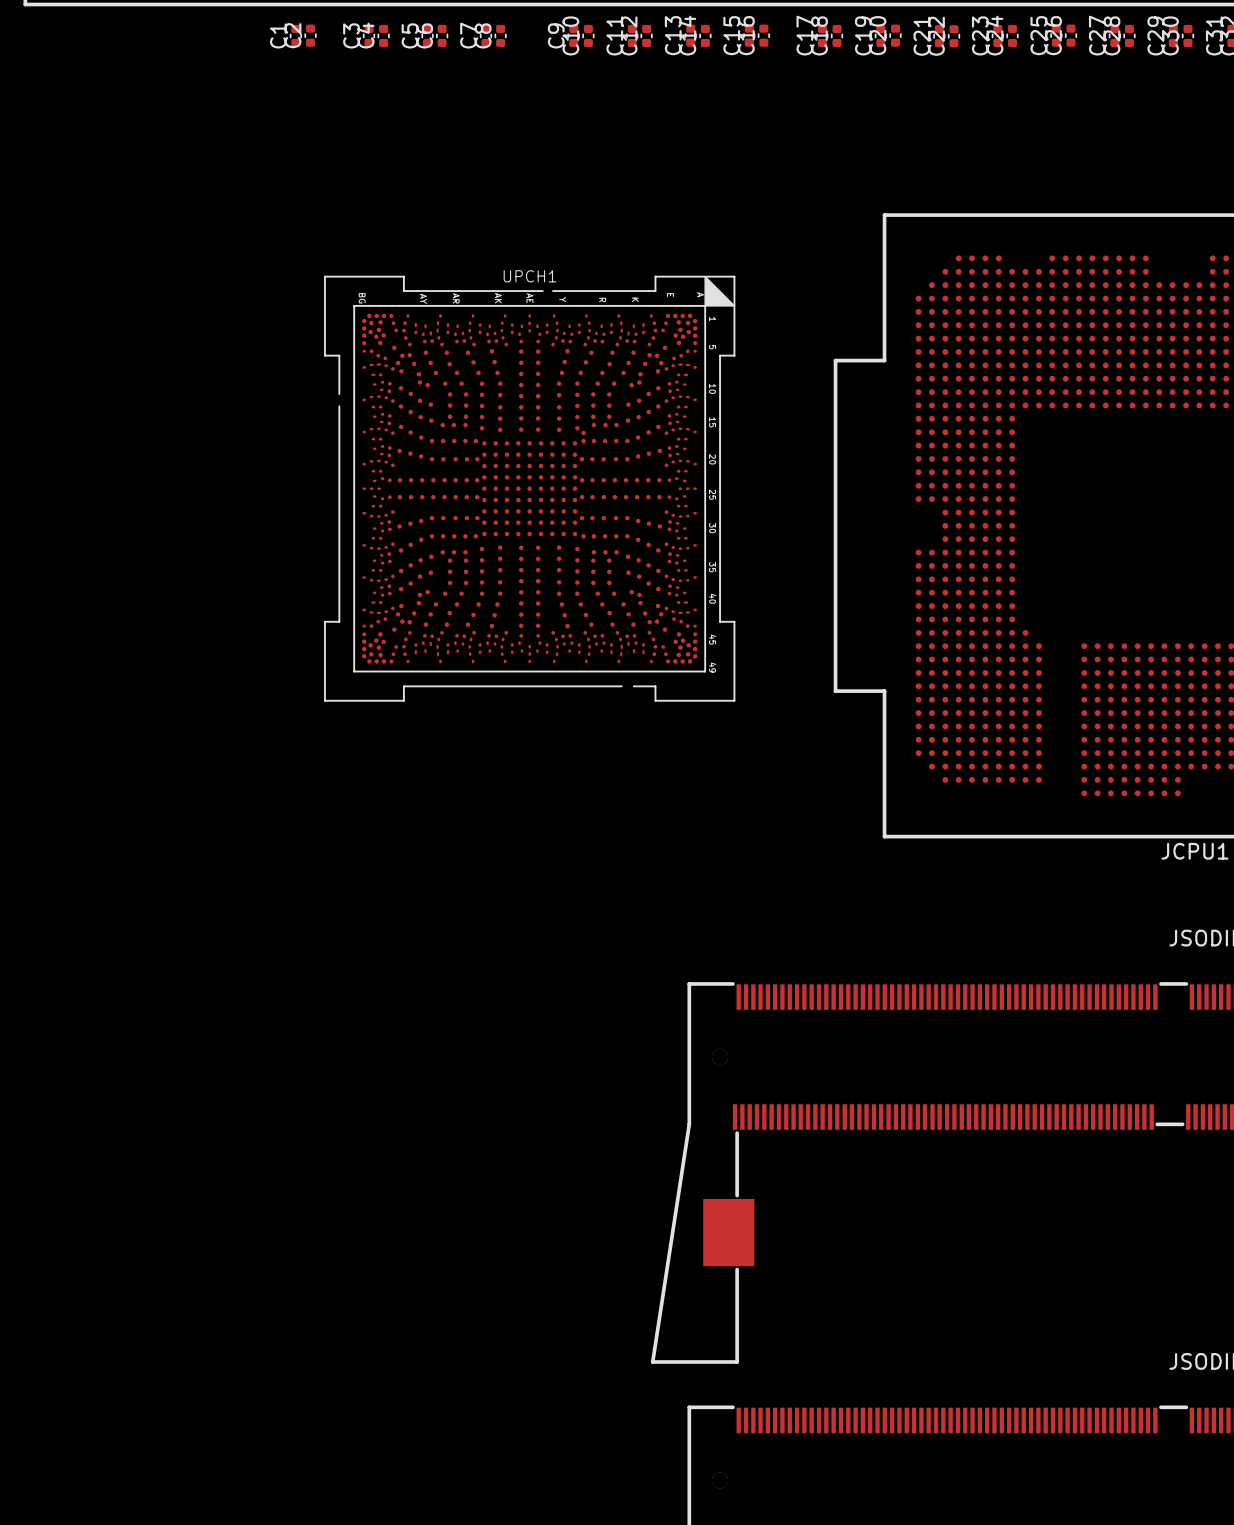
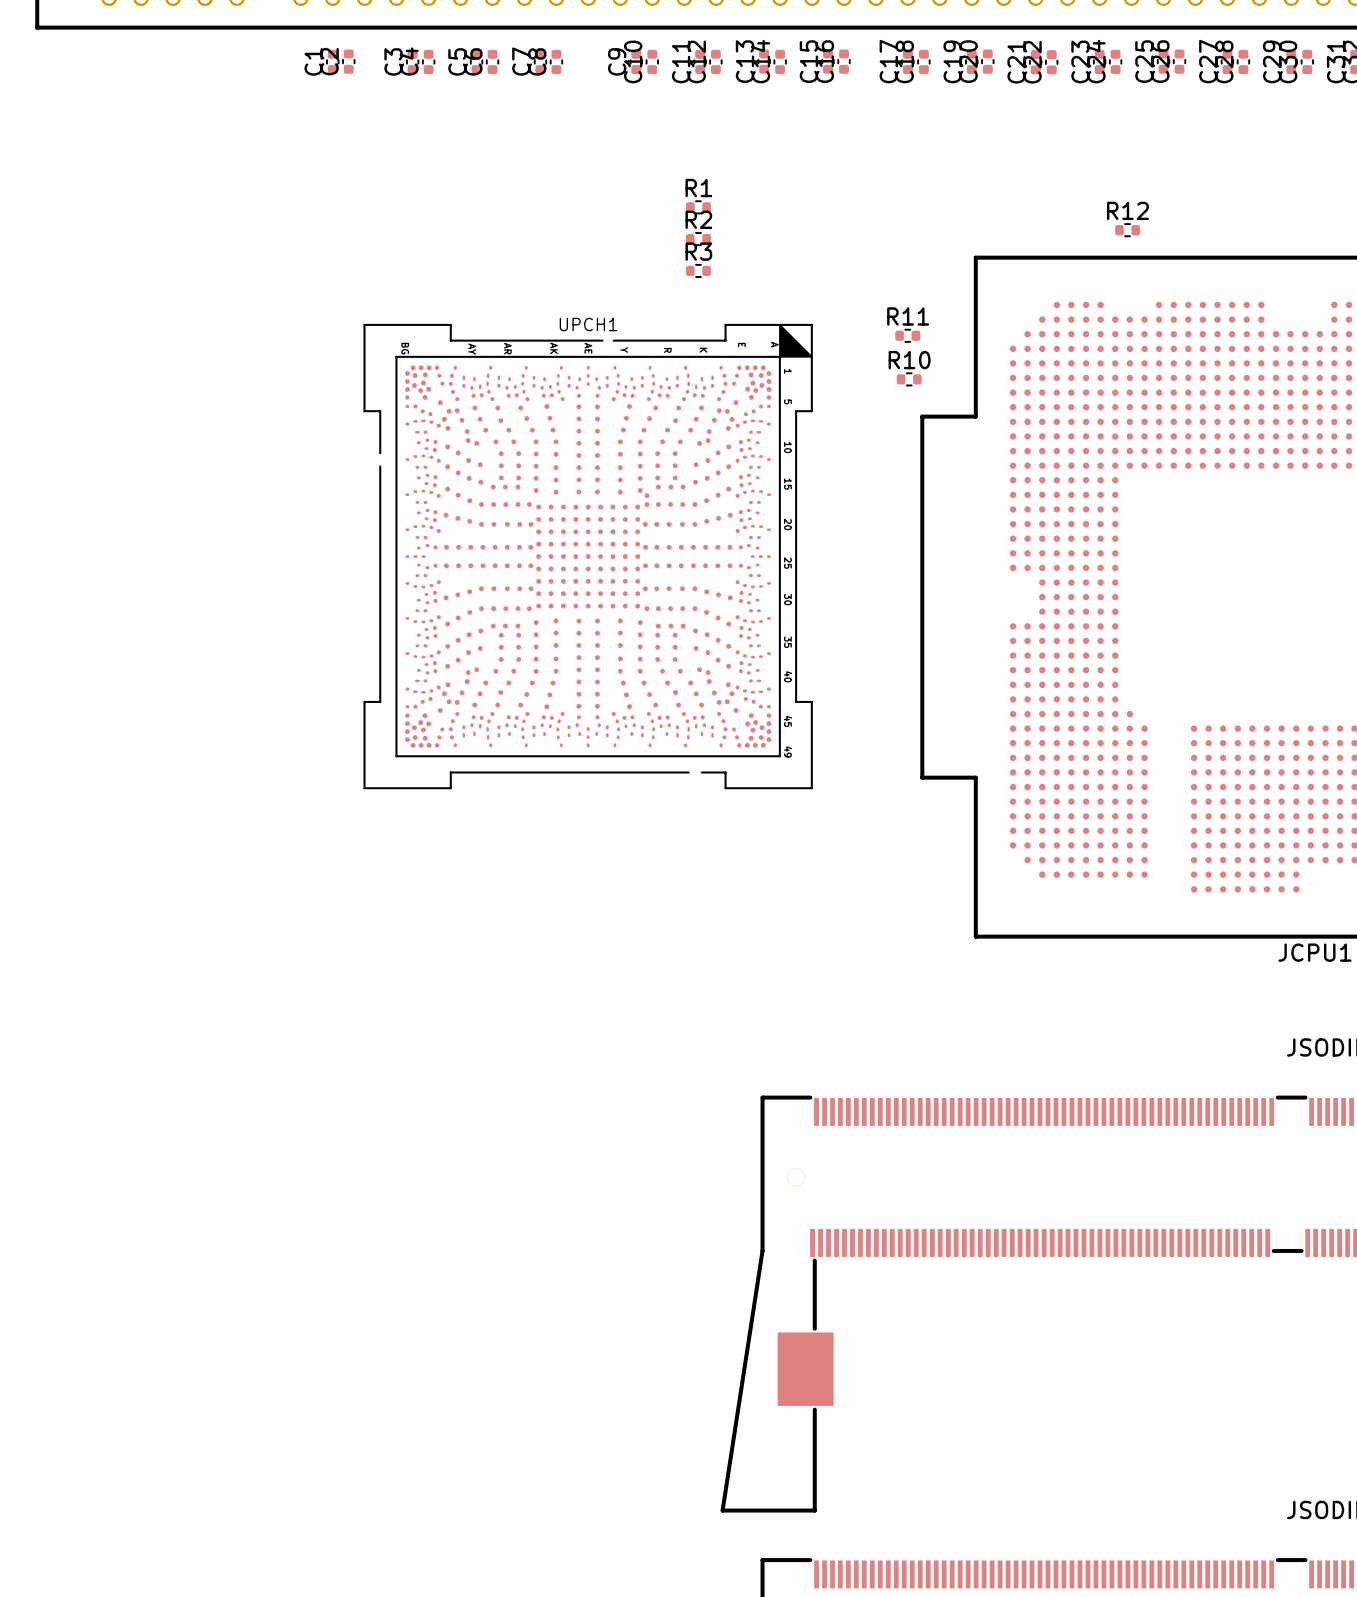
R1: none -> (698, 207)
R12: none -> (1127, 230)
R2: none -> (698, 239)
R3: none -> (698, 270)
R11: none -> (907, 335)
R10: none -> (909, 379)

